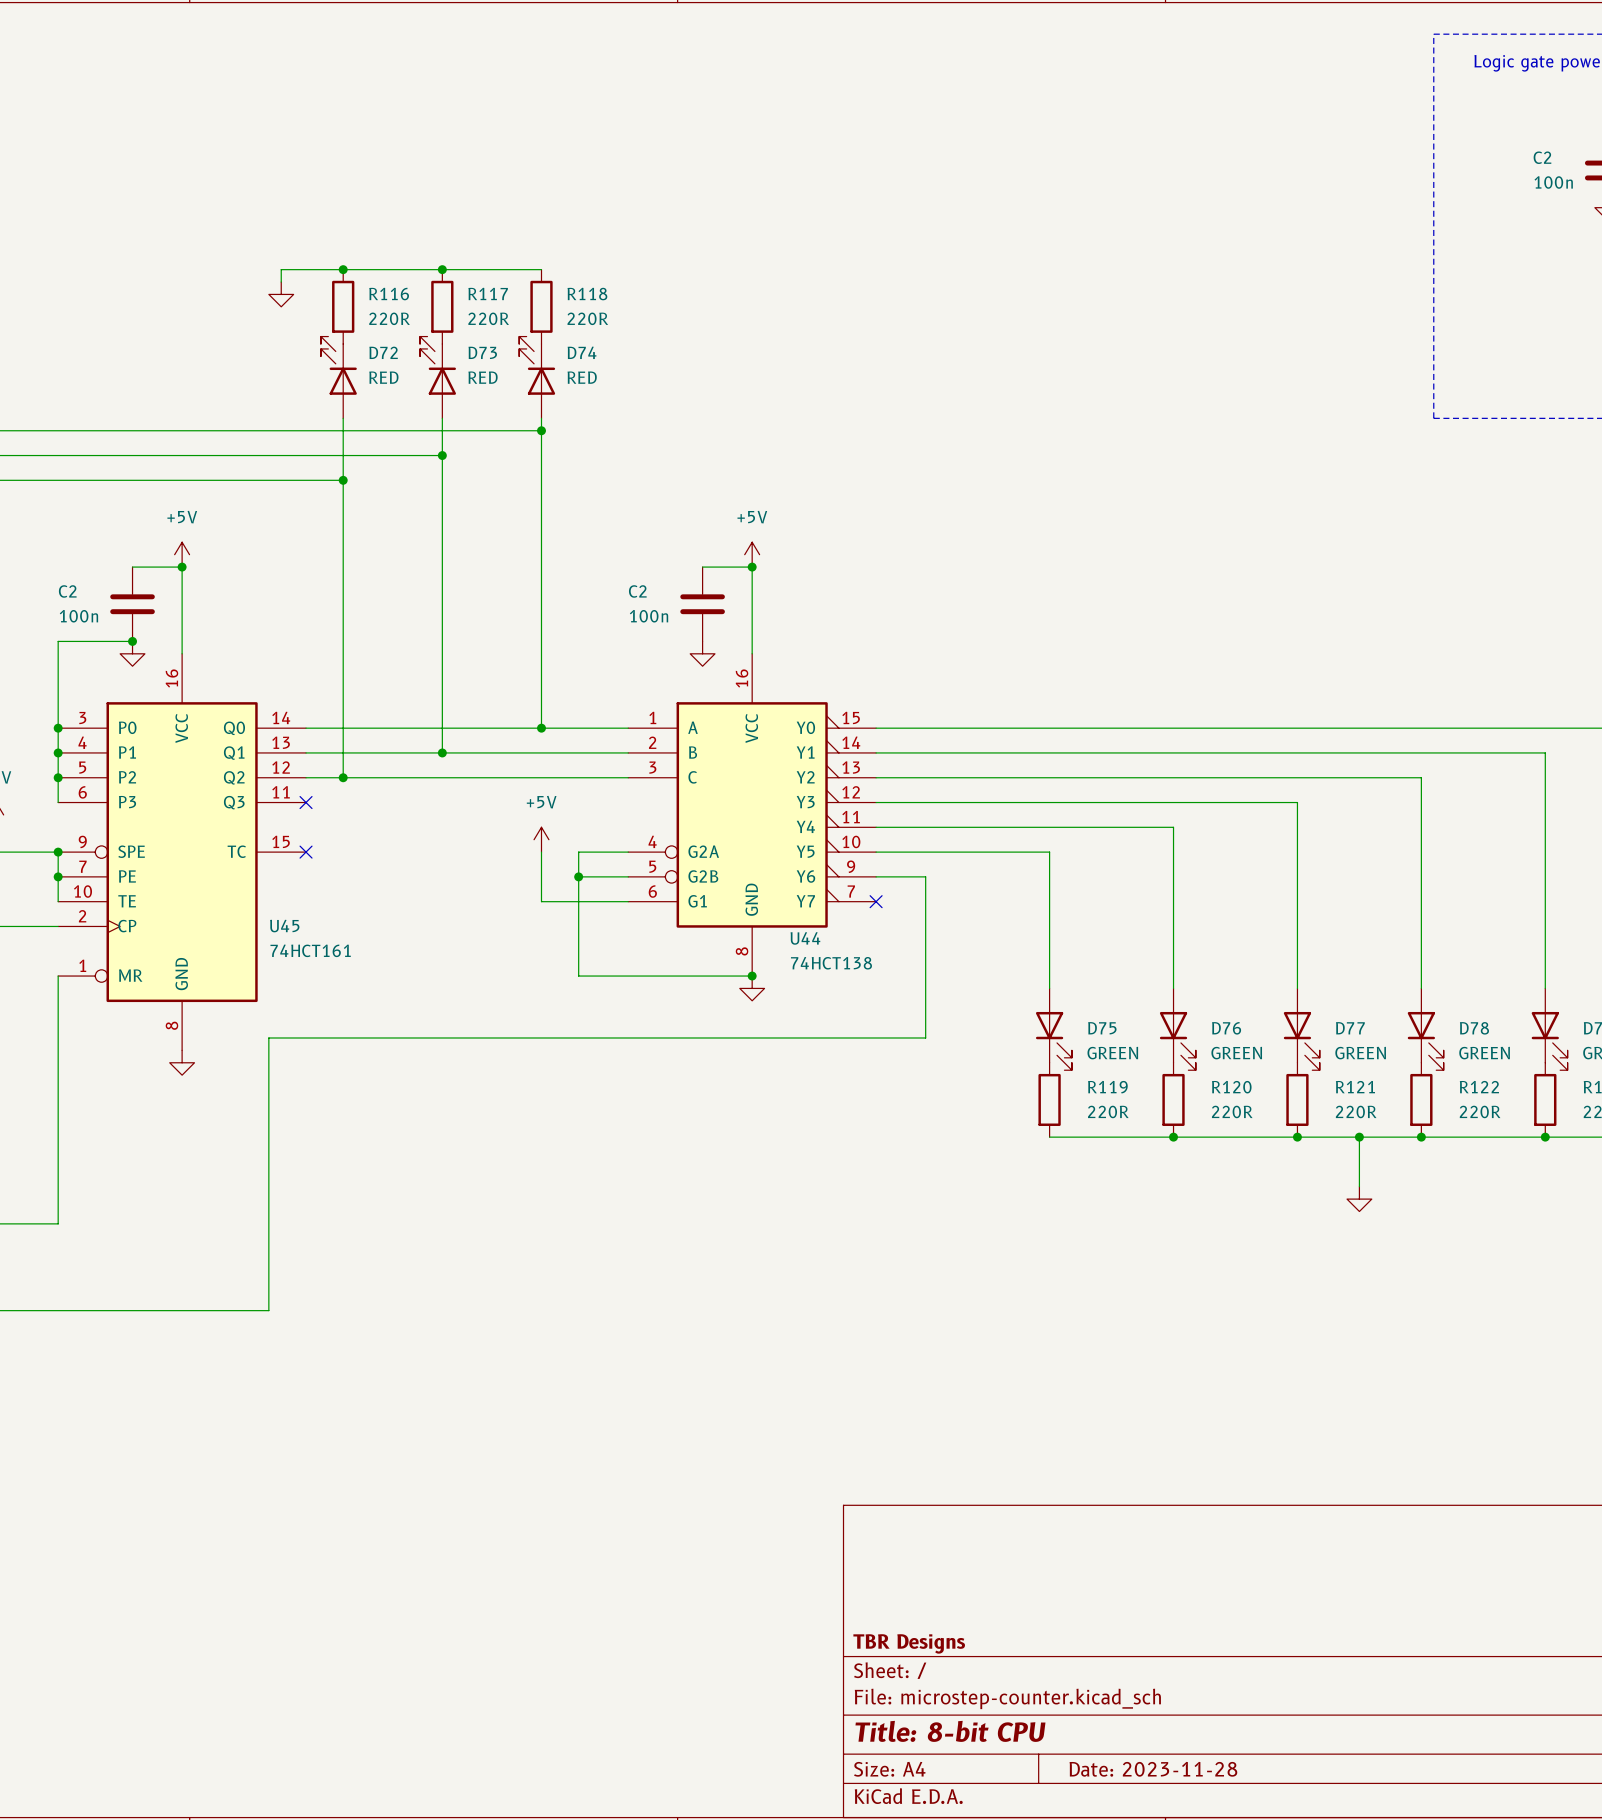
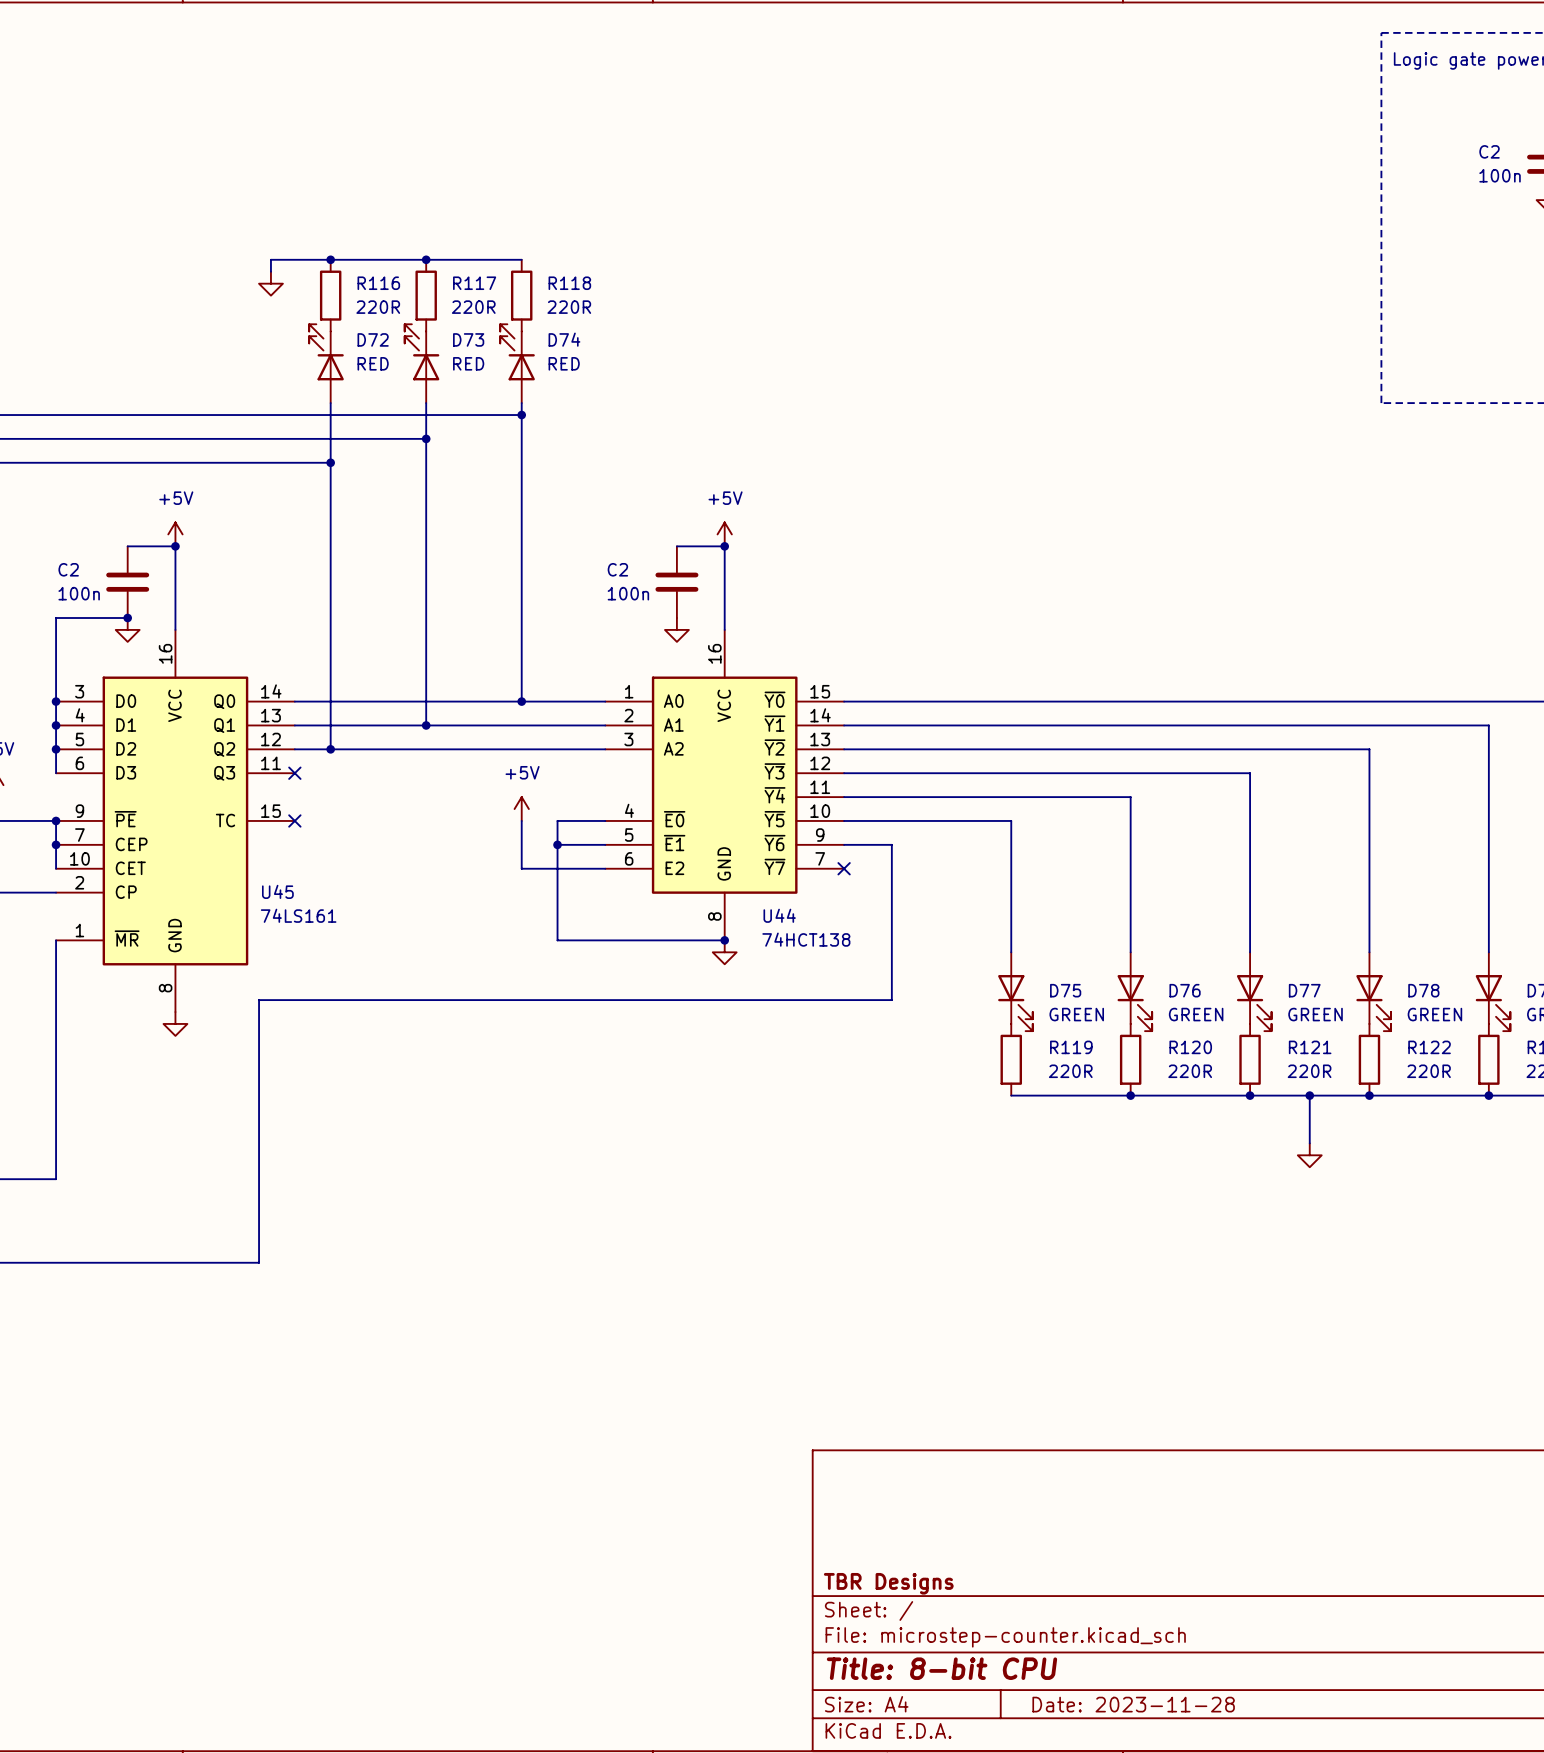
U45 symbol: [58, 653, 307, 1051] -> [56, 629, 295, 1013]
U44 symbol: [628, 653, 877, 977] -> [605, 629, 845, 941]
U45 value: 74HCT161 (310, 950) -> 74LS161 (298, 915)

